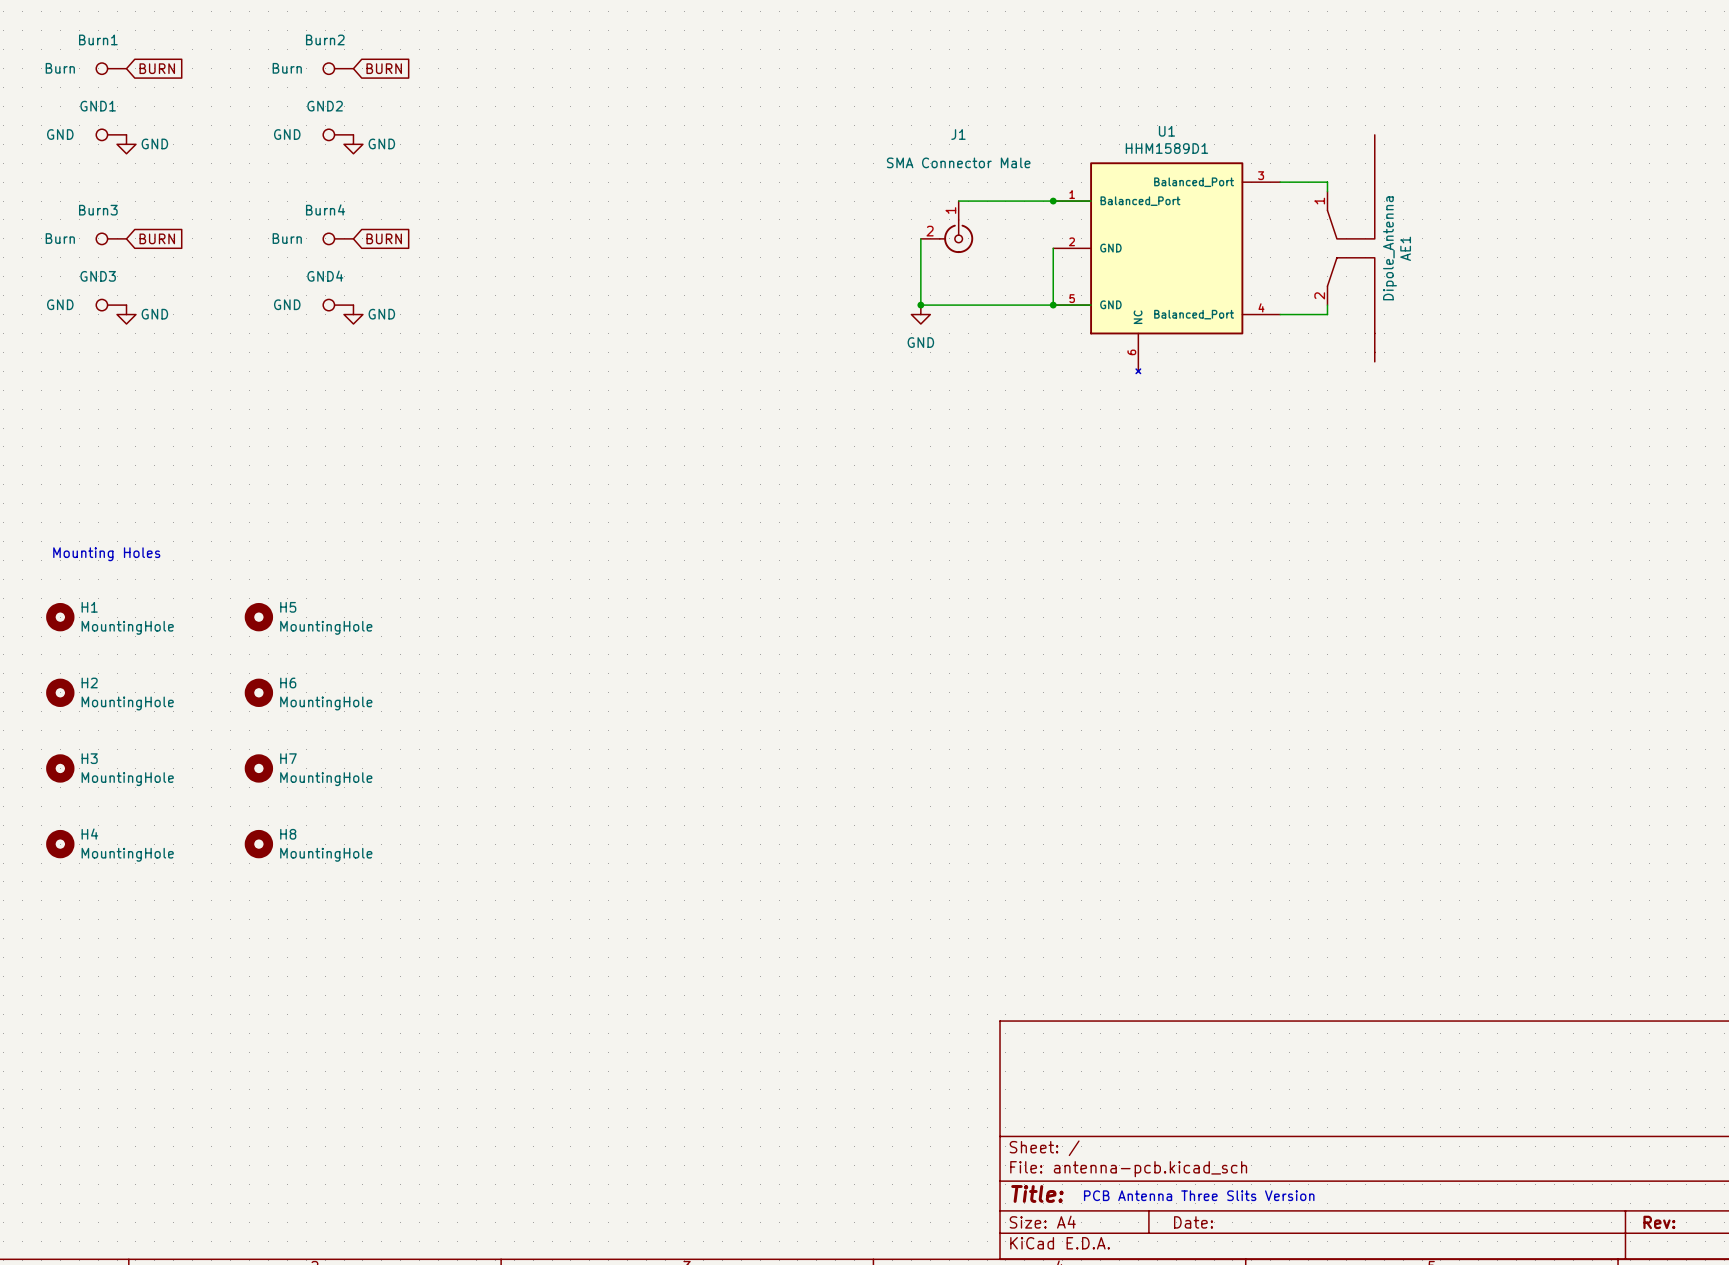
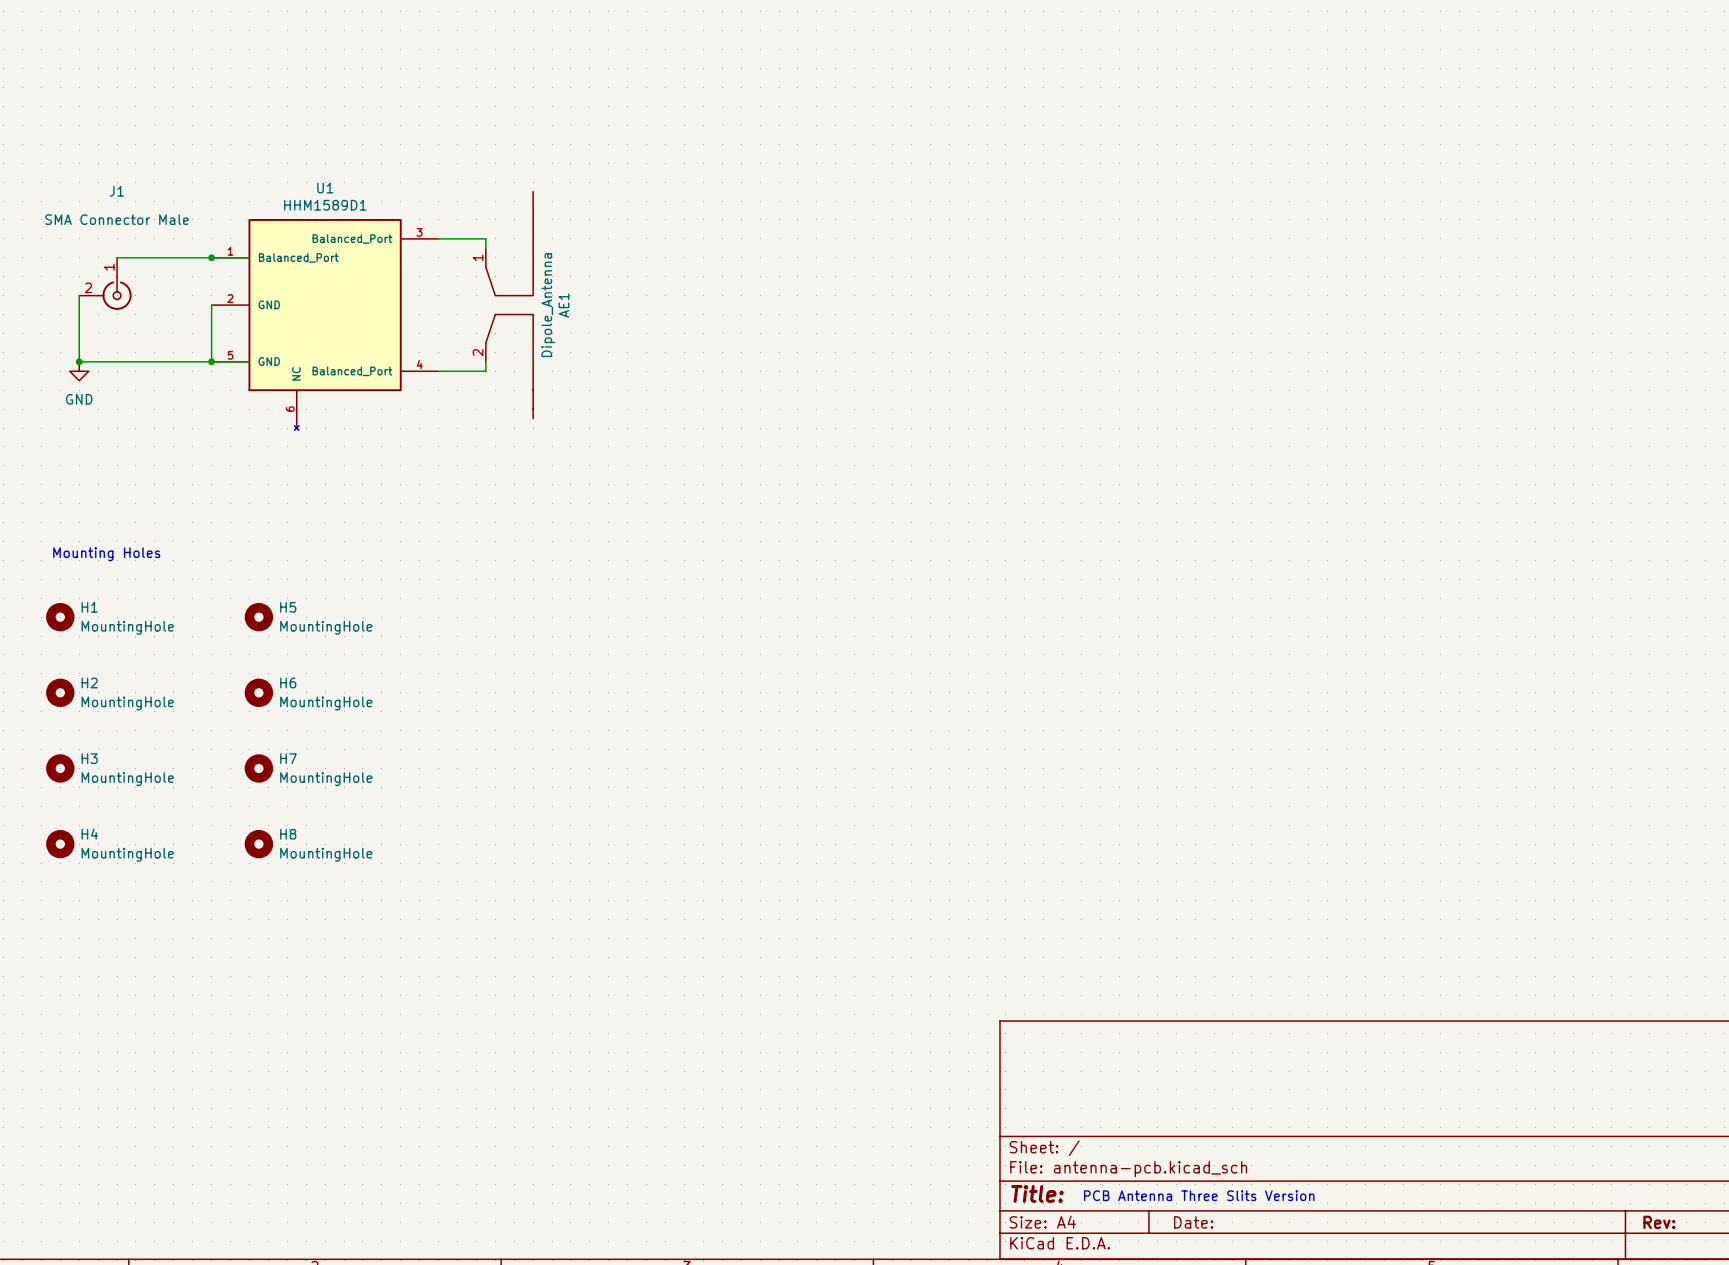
Burn1: Burn (111, 68) -> none
global label: BURN (157, 68) -> none
Burn2: Burn (338, 68) -> none
global label: BURN (384, 68) -> none
GND1: GND (111, 134) -> none
GND2: GND (338, 134) -> none
power symbol: GND (126, 144) -> none
power symbol: GND (353, 144) -> none
wire: (1280, 182) (1327, 182) (1327, 191) -> none
wire: (958, 201) (1091, 201) -> none
junction: (1053, 201) -> none
J1 position: (947, 227) -> (105, 283)
Burn3: Burn (111, 238) -> none
global label: BURN (157, 238) -> none
Burn4: Burn (338, 238) -> none
global label: BURN (384, 238) -> none
wire: none -> (438, 238) (485, 238) (485, 248)
wire: (920, 238) (920, 305) (1091, 305) -> none
wire: (1053, 248) (1053, 305) -> none
AE1 position: (1351, 248) -> (509, 305)
wire: none -> (117, 257) (249, 257)
junction: none -> (211, 257)
U1 position: (1166, 267) -> (325, 324)
wire: none -> (79, 295) (79, 361) (249, 361)
GND3: GND (111, 305) -> none
wire: none -> (211, 305) (211, 361)
GND4: GND (338, 305) -> none
junction: (920, 305) -> none
junction: (1053, 305) -> none
wire: (1327, 305) (1327, 314) (1280, 314) -> none
power symbol position: GND (126, 314) -> GND (79, 371)
power symbol text position: GND (154, 314) -> GND (79, 399)
power symbol: GND (353, 314) -> none
power symbol: GND (920, 314) -> none
junction: none -> (79, 361)
junction: none -> (211, 361)
wire: none -> (485, 361) (485, 371) (438, 371)

